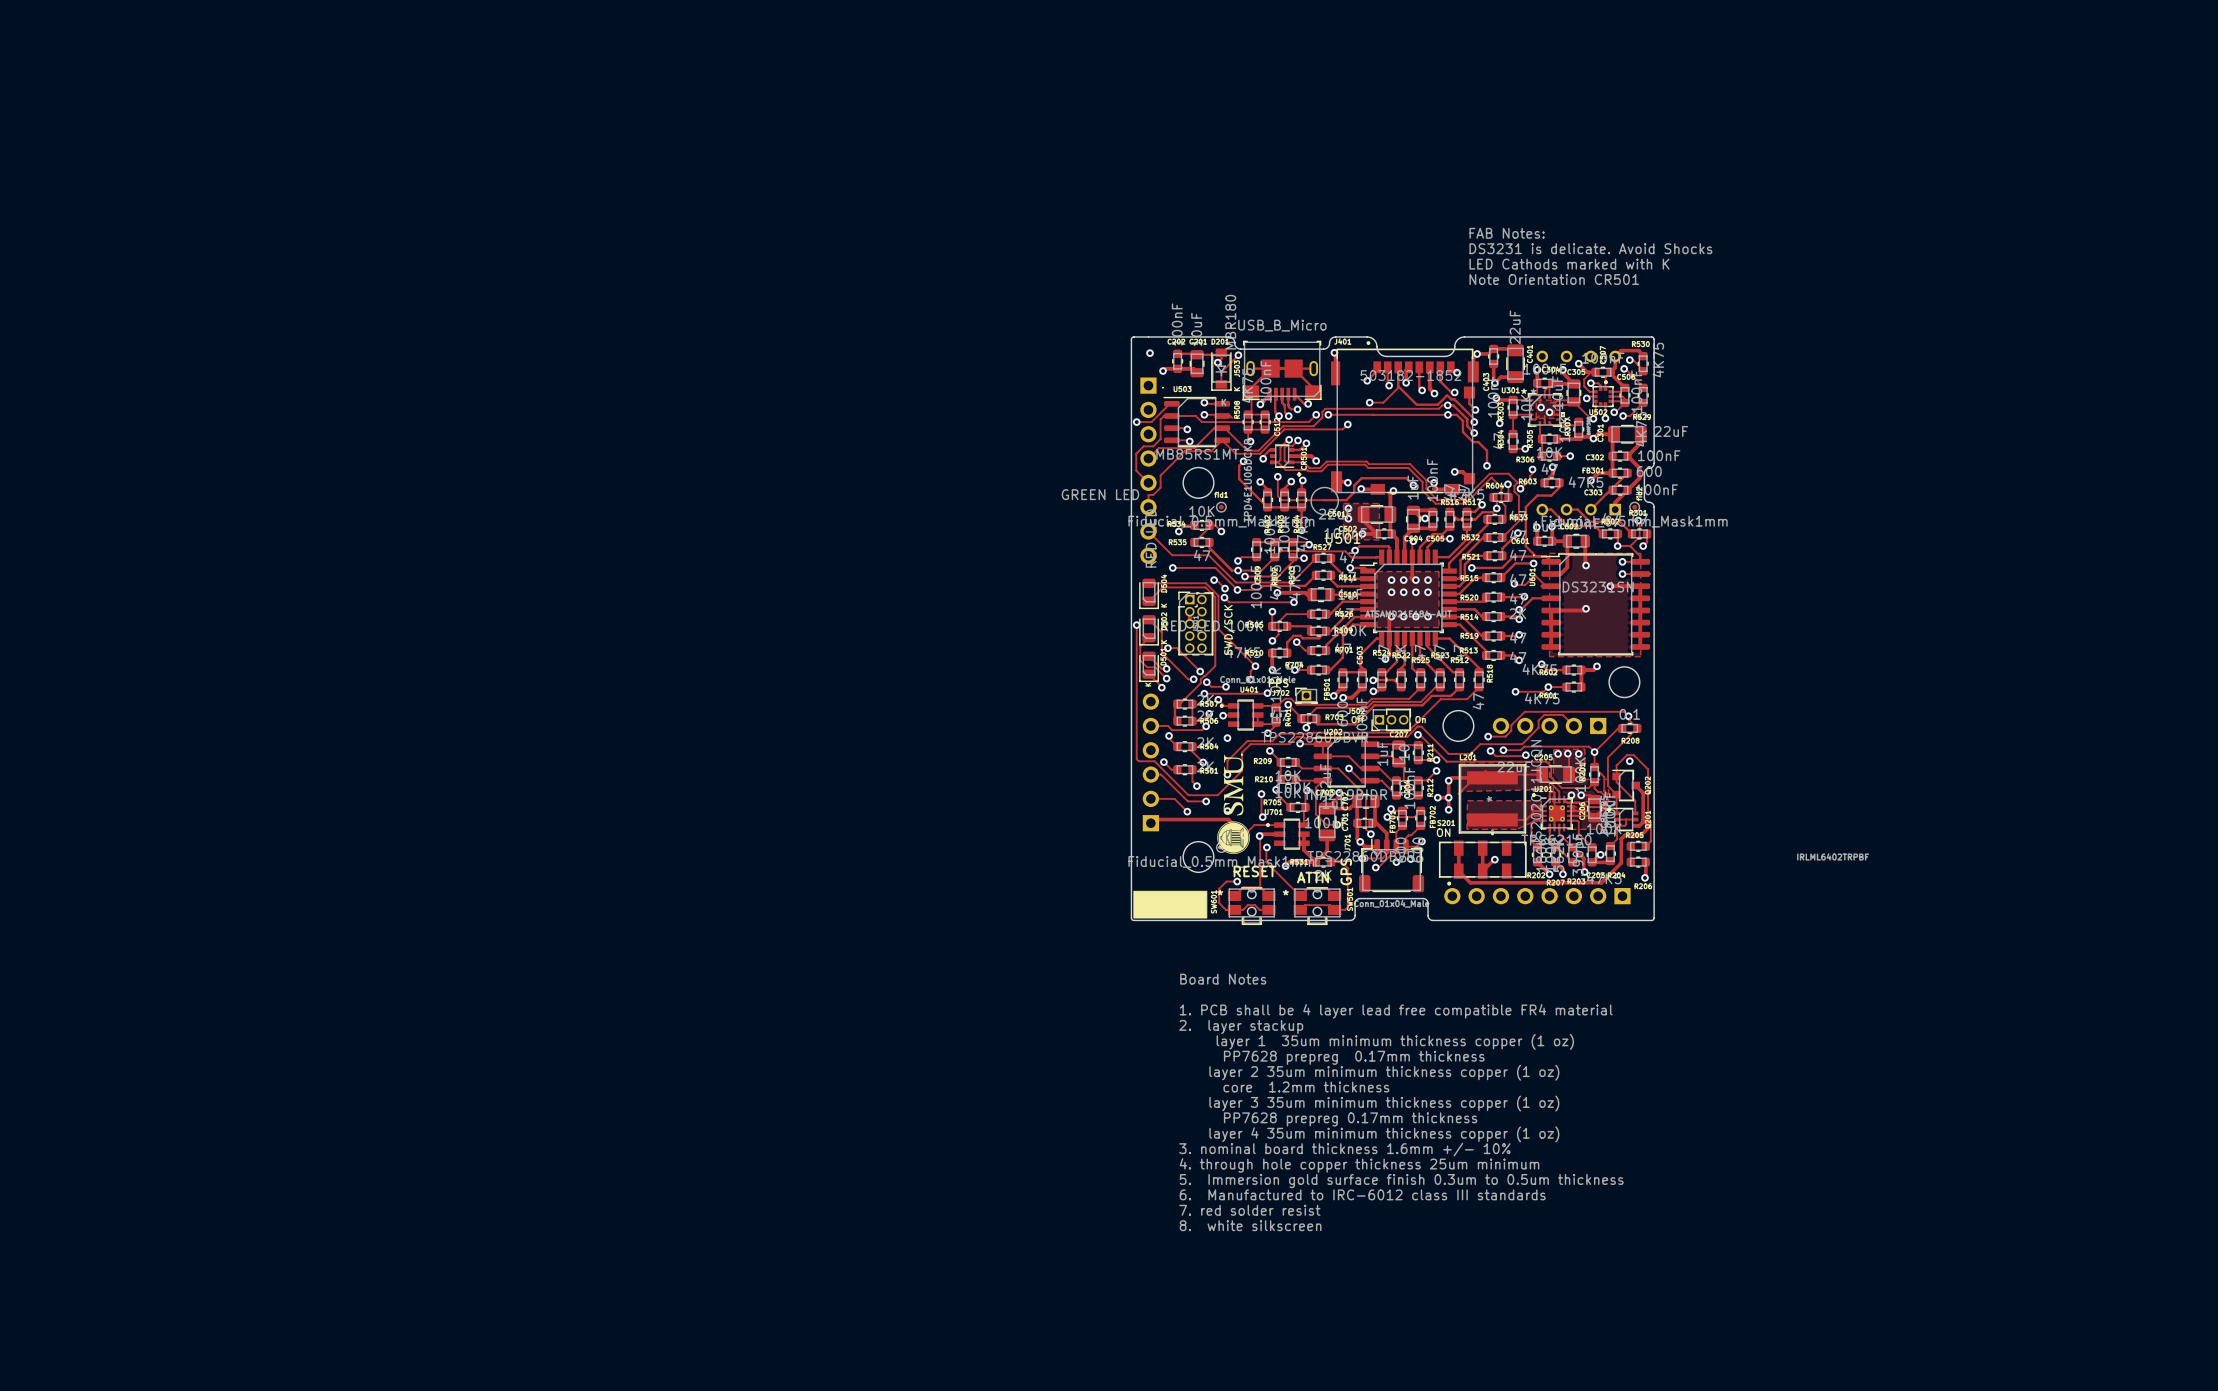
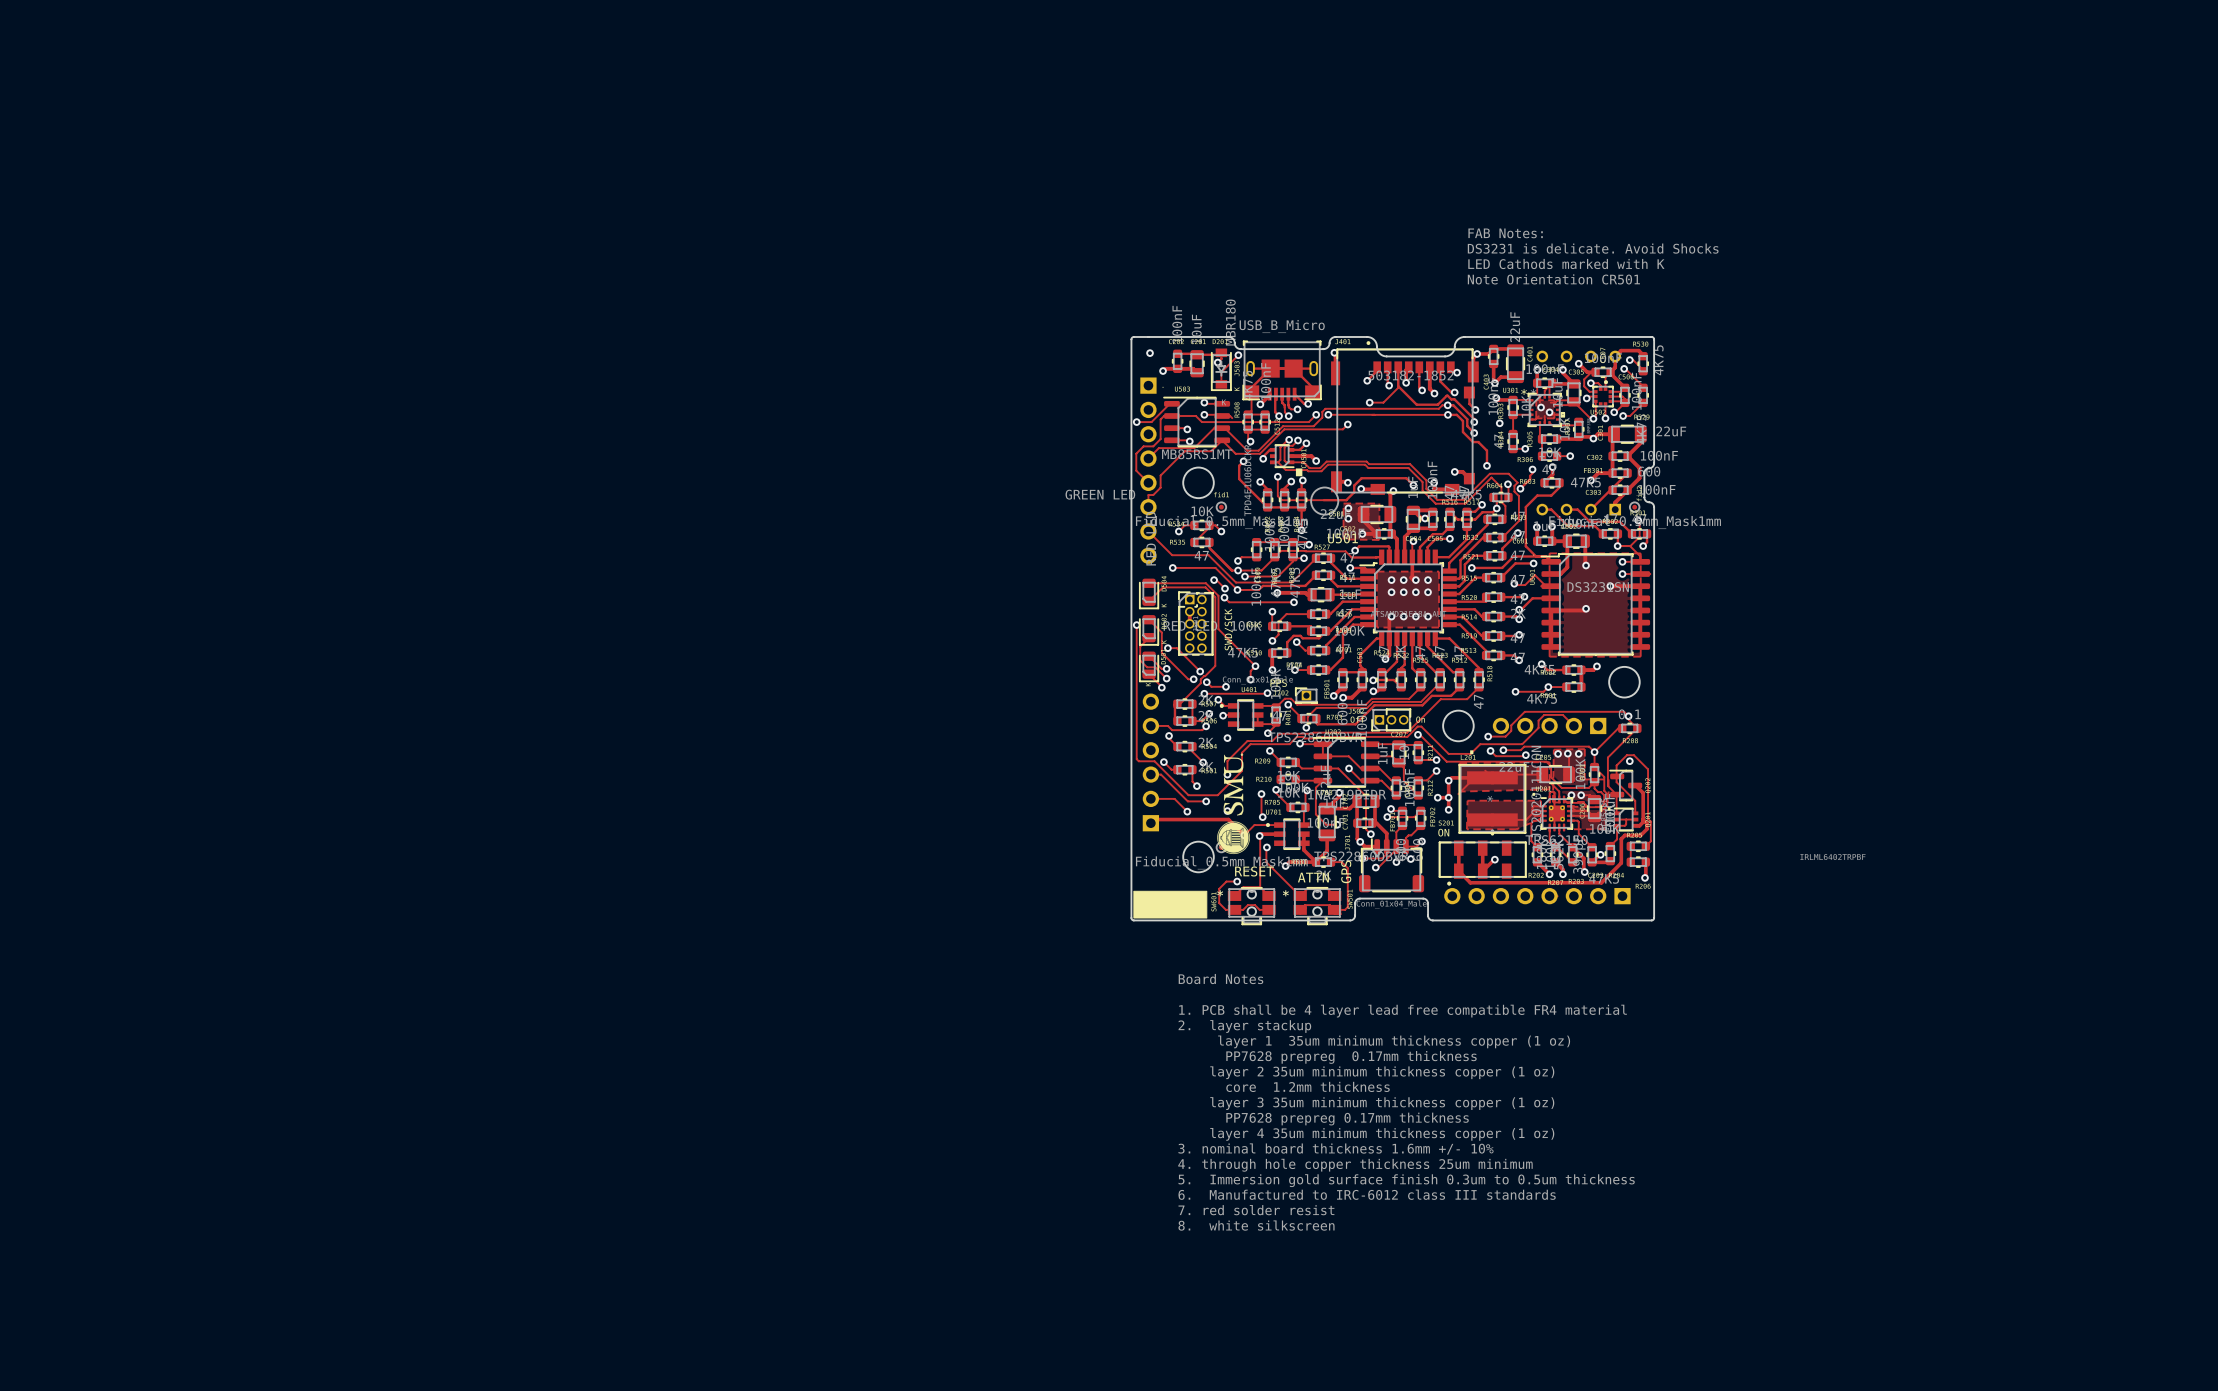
part footprint: [1612, 769, 1641, 802] -> [1609, 770, 1643, 802]

